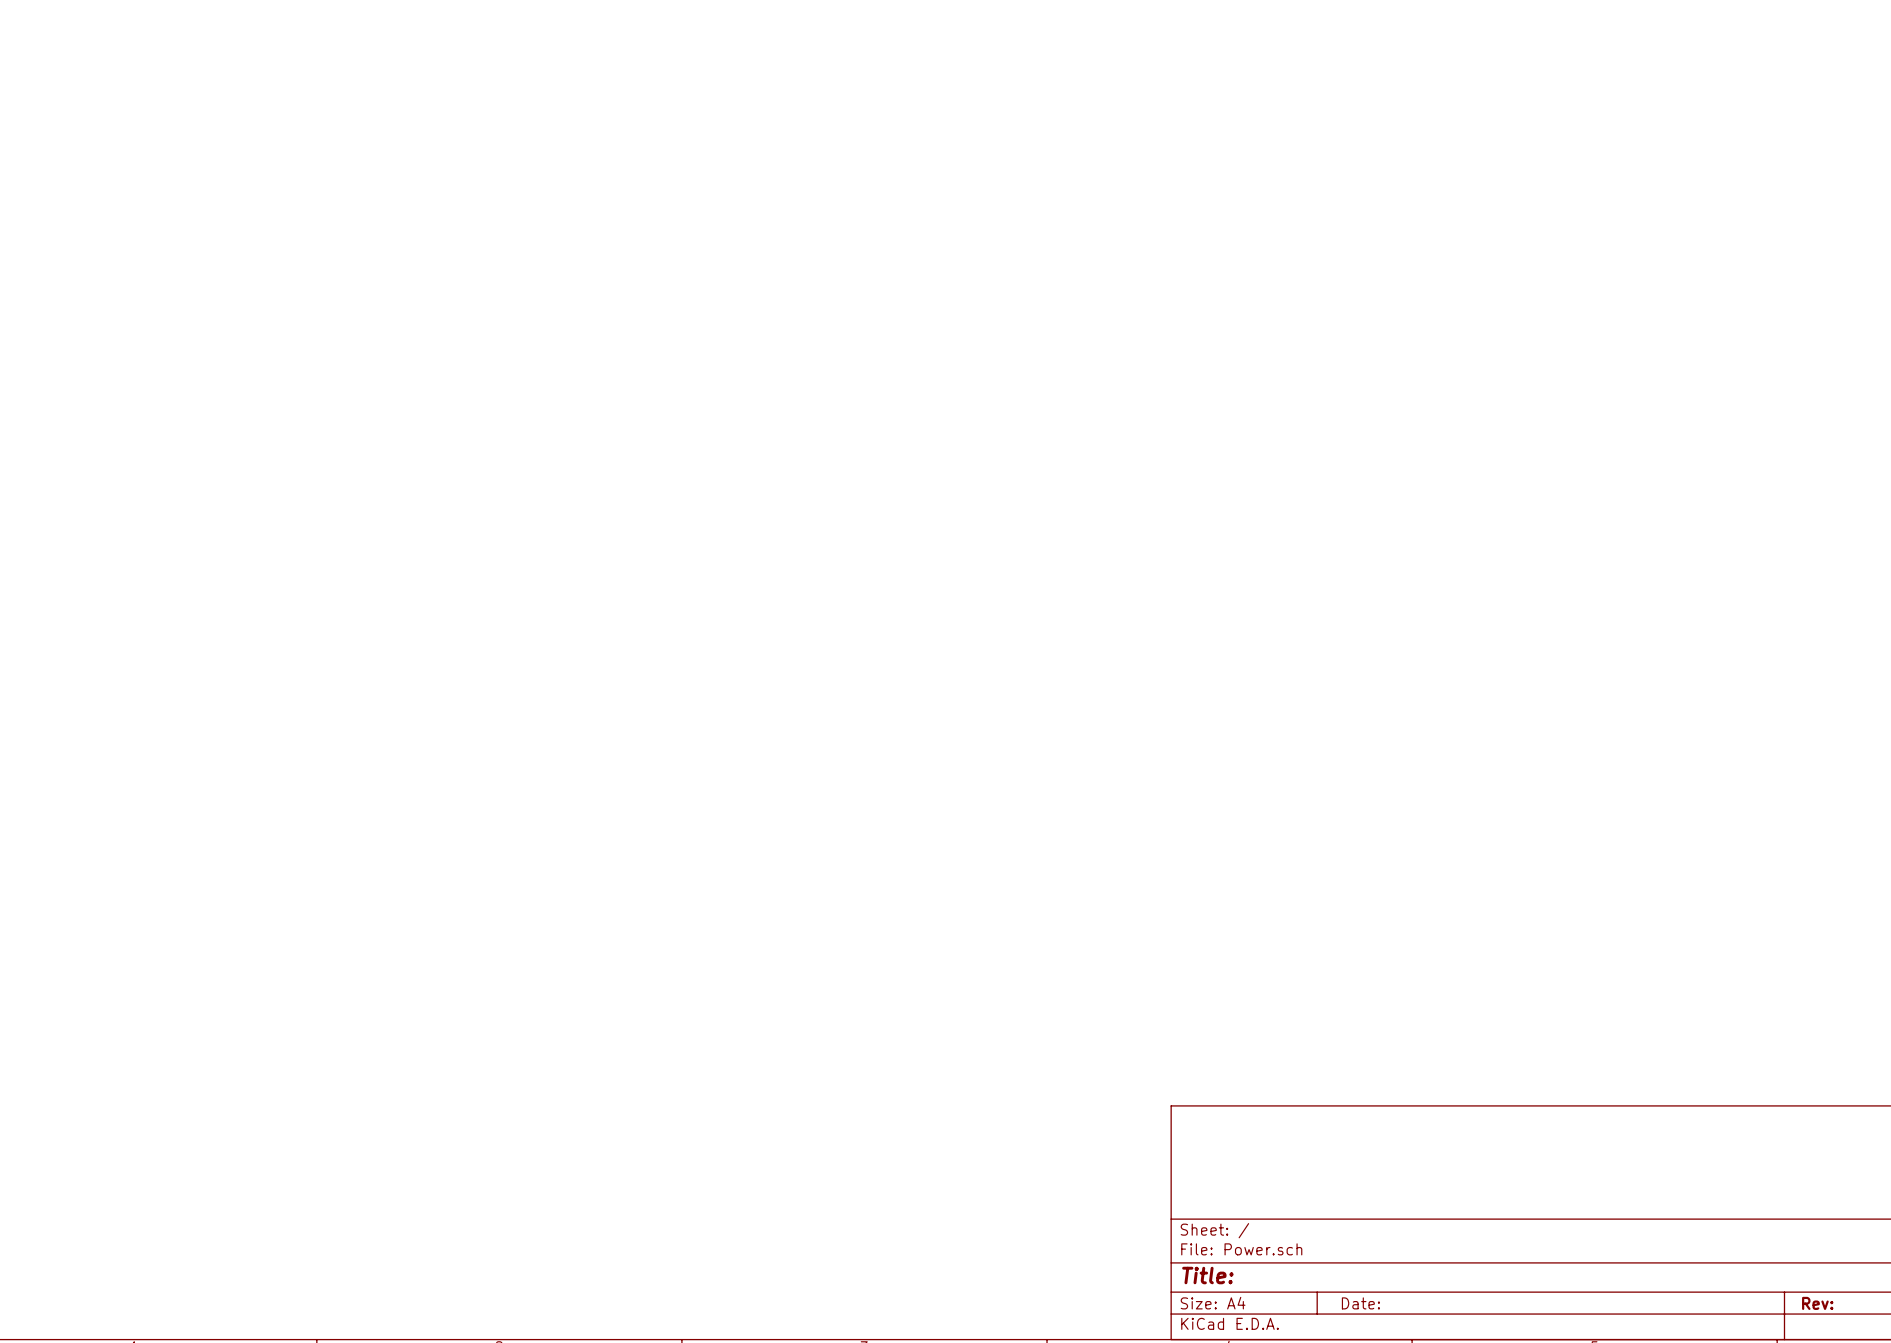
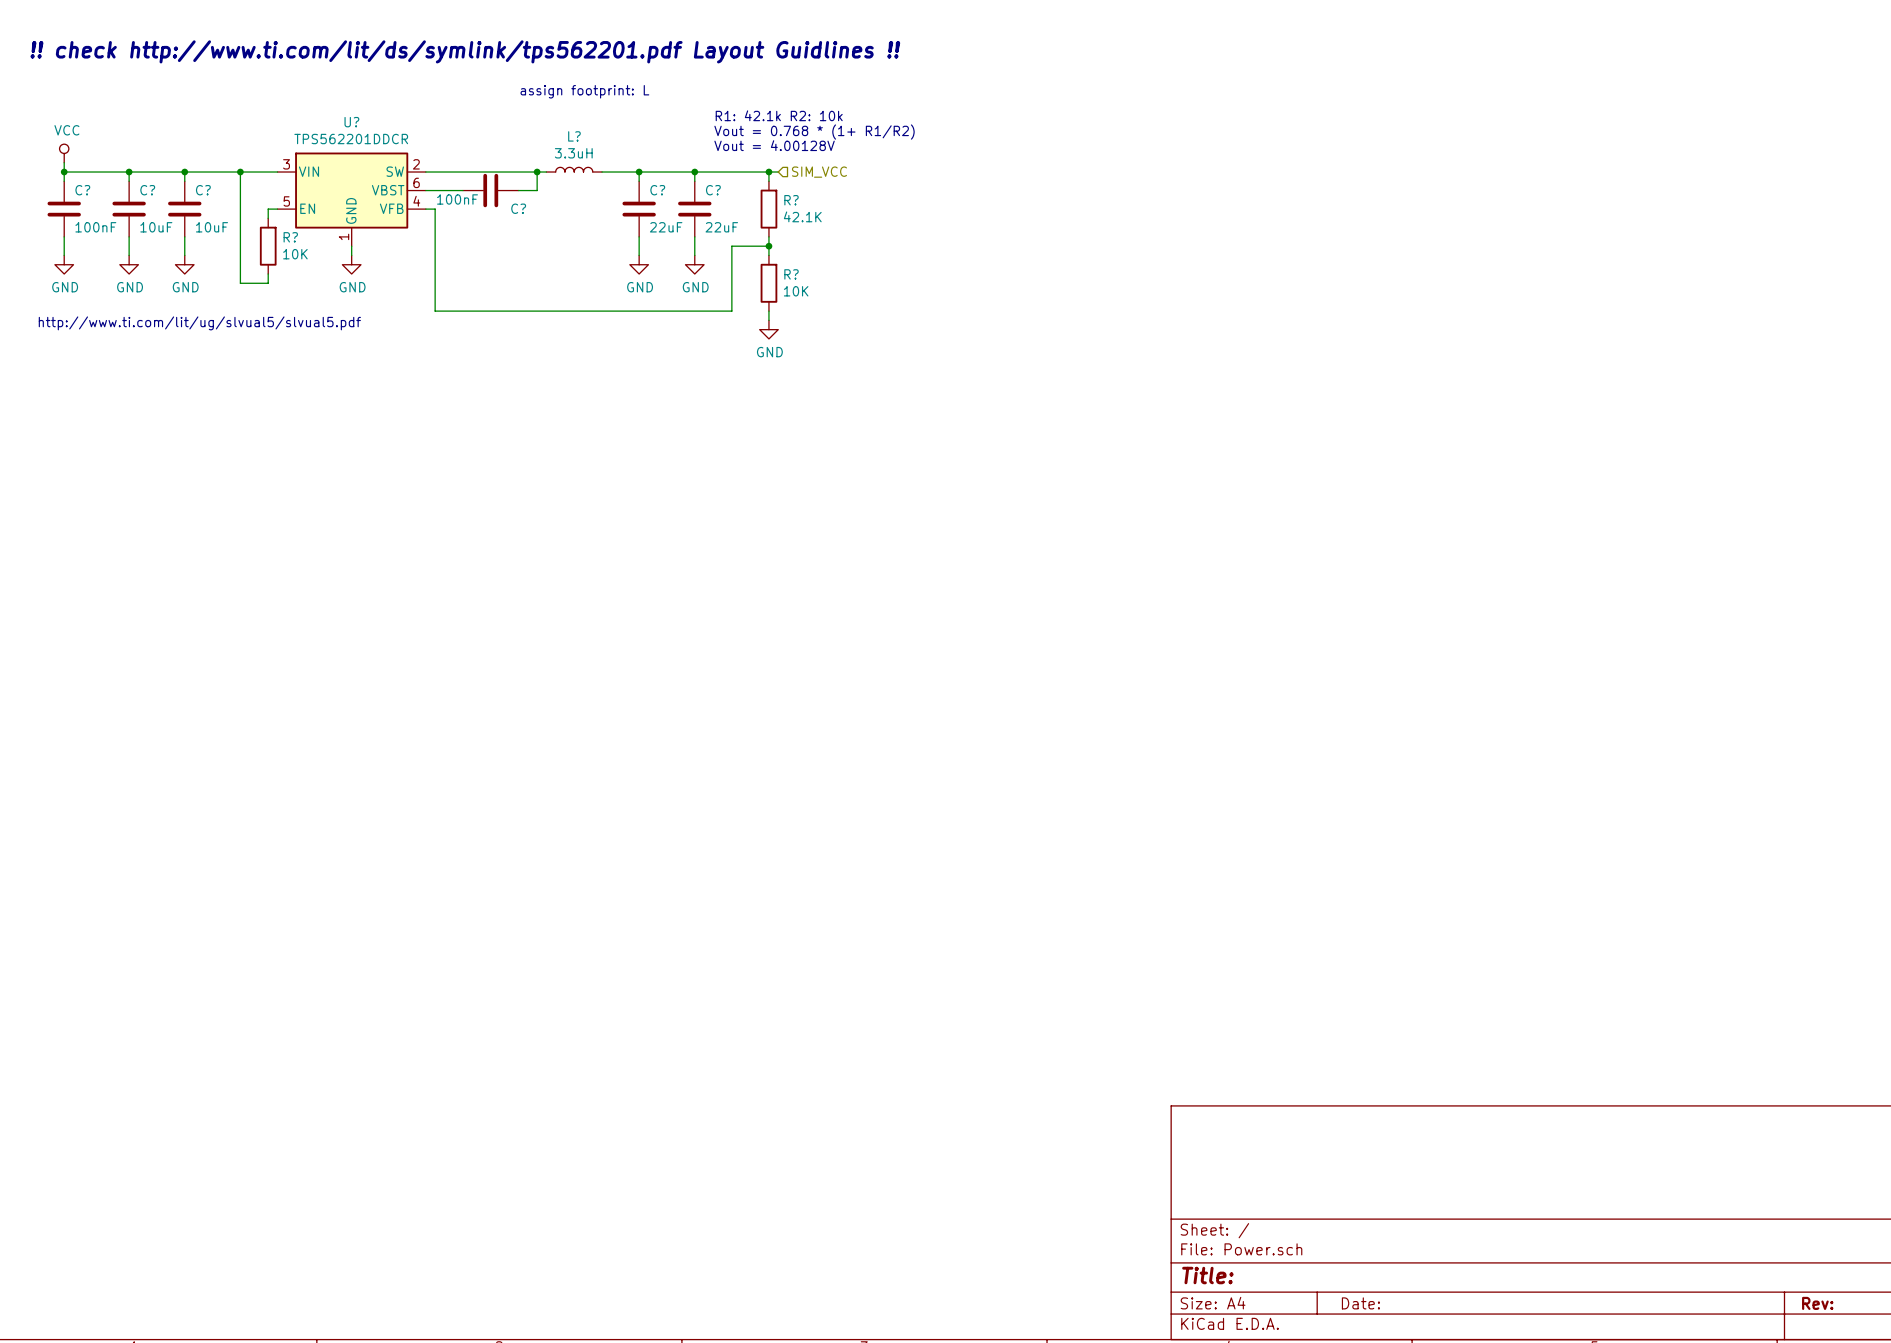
text: none -> !! check http://www.ti.com/lit/ds/symlink/tps562201.pdf Layout Guidlines !! (465, 51)
text: none -> assign footprint: L (584, 91)
text: none -> R1: 42.1k R2: 10k (779, 115)
text: none -> Vout = 0.768 * (1+ R1/R2) (814, 132)
text: none -> Vout = 4.00128V (774, 145)
power symbol: none -> VCC (64, 153)
wire: none -> (64, 162) (64, 181)
L?: none -> 3.3uH (574, 169)
wire: none -> (64, 172) (277, 172)
junction: none -> (64, 172)
wire: none -> (129, 172) (129, 181)
junction: none -> (129, 172)
wire: none -> (184, 172) (184, 181)
junction: none -> (184, 172)
wire: none -> (240, 172) (240, 283) (268, 283) (268, 274)
junction: none -> (240, 172)
wire: none -> (425, 172) (546, 172)
wire: none -> (537, 172) (537, 190) (518, 190)
junction: none -> (537, 172)
wire: none -> (602, 172) (778, 172)
wire: none -> (639, 172) (639, 181)
junction: none -> (639, 172)
wire: none -> (694, 172) (694, 181)
junction: none -> (694, 172)
wire: none -> (768, 172) (768, 181)
junction: none -> (768, 172)
hierarchical label: none -> SIM_VCC (819, 172)
wire: none -> (425, 190) (462, 190)
C?: none -> 100nF (490, 190)
U?: none -> TPS562201DDCR (351, 199)
C?: none -> 100nF (64, 209)
C?: none -> 10uF (129, 209)
C?: none -> 10uF (184, 209)
wire: none -> (277, 209) (268, 209) (268, 218)
wire: none -> (425, 209) (435, 209) (435, 311) (731, 311) (731, 246) (768, 246)
C?: none -> 22uF (639, 209)
C?: none -> 22uF (694, 209)
R?: none -> 42.1K (768, 209)
wire: none -> (64, 236) (64, 255)
wire: none -> (129, 236) (129, 255)
wire: none -> (184, 236) (184, 255)
wire: none -> (639, 236) (639, 255)
wire: none -> (694, 236) (694, 255)
wire: none -> (768, 236) (768, 255)
R?: none -> 10K (268, 246)
wire: none -> (351, 246) (351, 255)
junction: none -> (768, 246)
power symbol: none -> GND (64, 264)
power symbol: none -> GND (129, 264)
power symbol: none -> GND (184, 264)
power symbol: none -> GND (351, 264)
power symbol: none -> GND (639, 264)
power symbol: none -> GND (694, 264)
R?: none -> 10K (768, 283)
wire: none -> (768, 311) (768, 320)
text: none -> http://www.ti.com/lit/ug/slvual5/slvual5.pdf (199, 323)
power symbol: none -> GND (768, 329)

